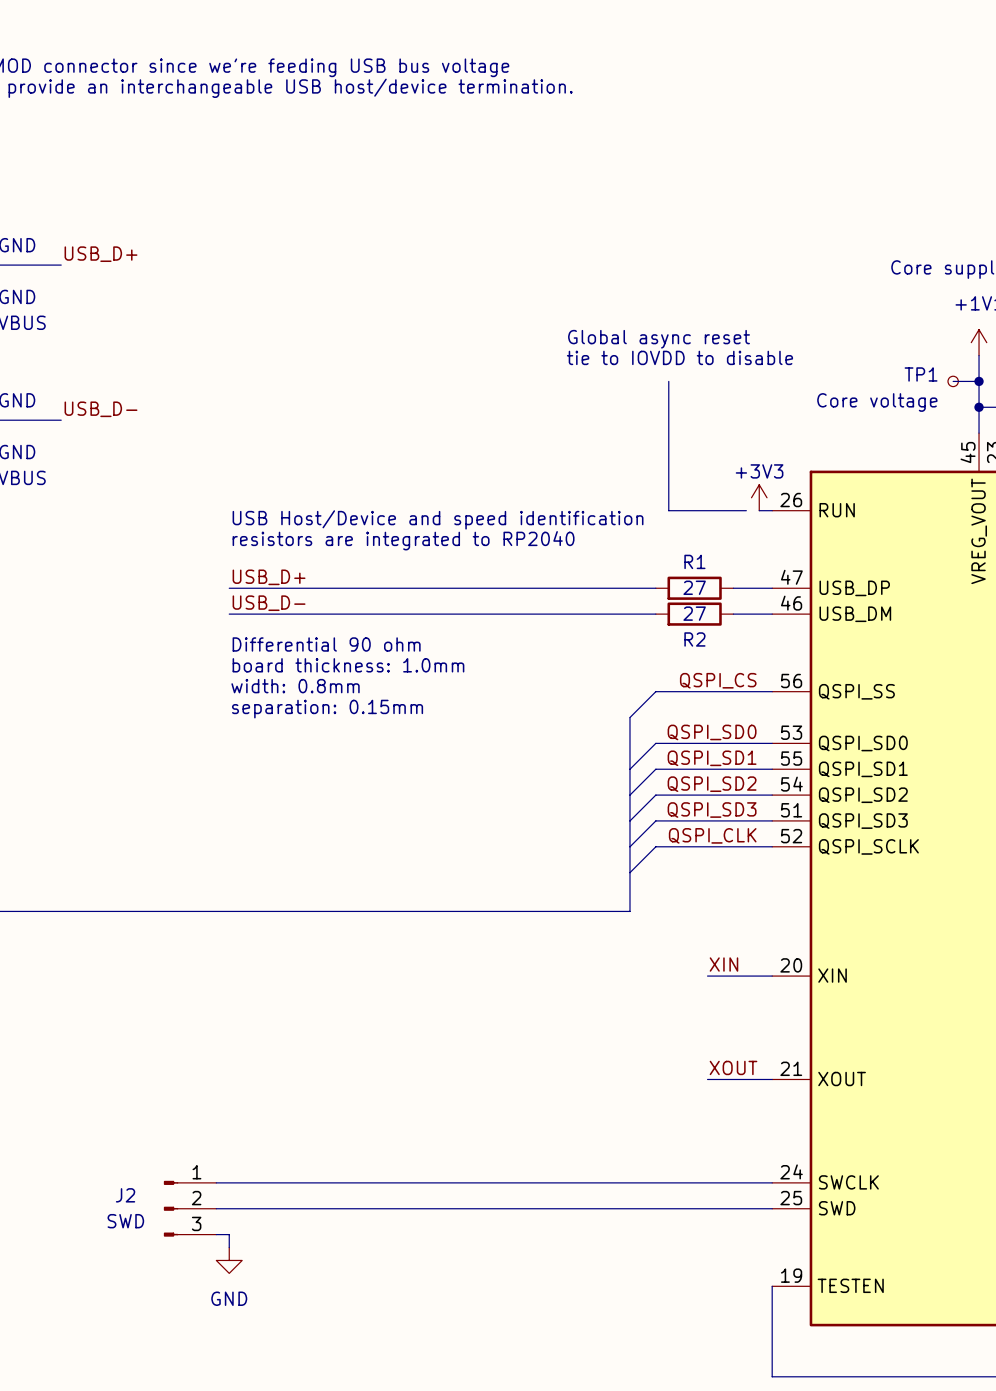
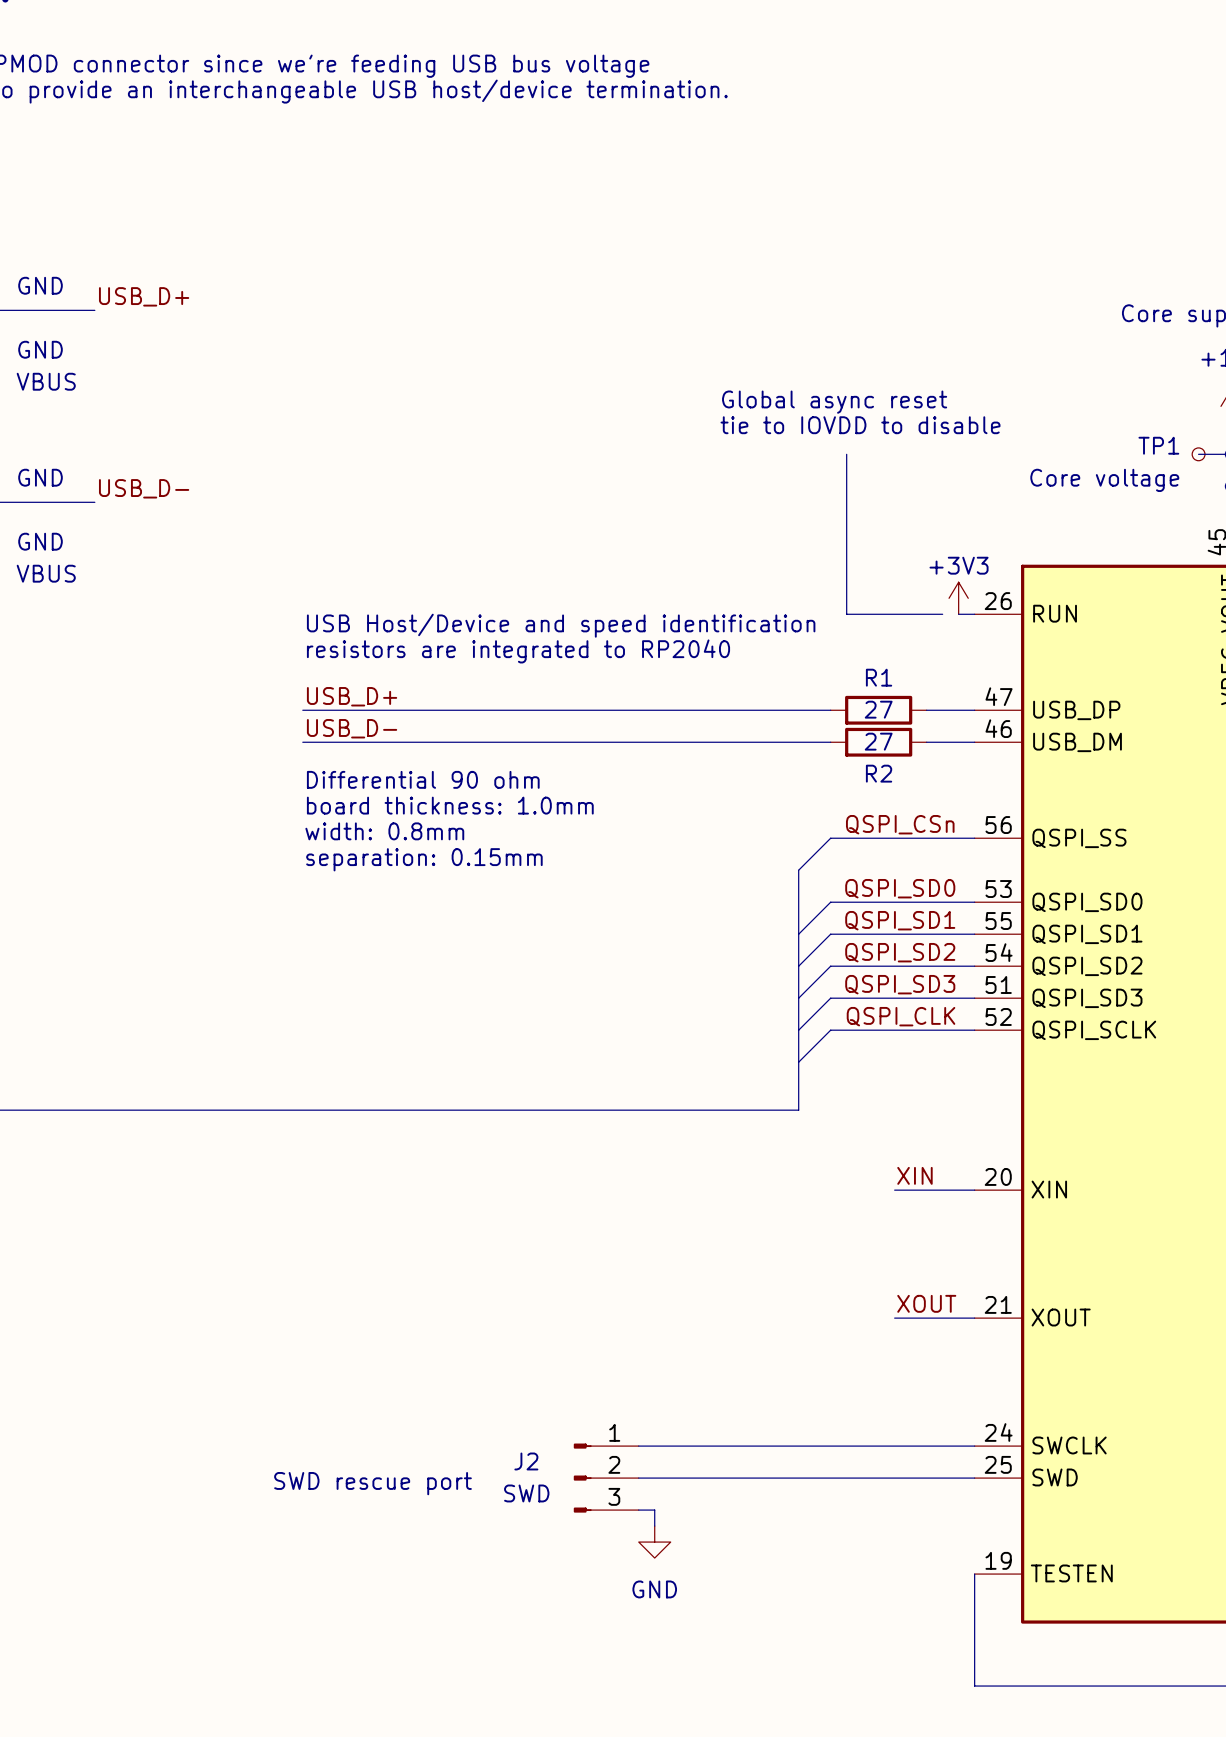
label: QSPI_CS (718, 680) -> QSPI_CSn (900, 824)
wire: (216, 1182) (500, 1182) -> none
J2 position: (190, 1208) -> (606, 1478)
wire: (216, 1208) (500, 1208) -> none
text: none -> SWD rescue port (373, 1483)
wire: (216, 1234) (229, 1234) (229, 1247) -> none
wire: none -> (638, 1510) (654, 1510) (654, 1526)
power symbol: GND (229, 1260) -> none
power symbol: none -> GND (654, 1542)

